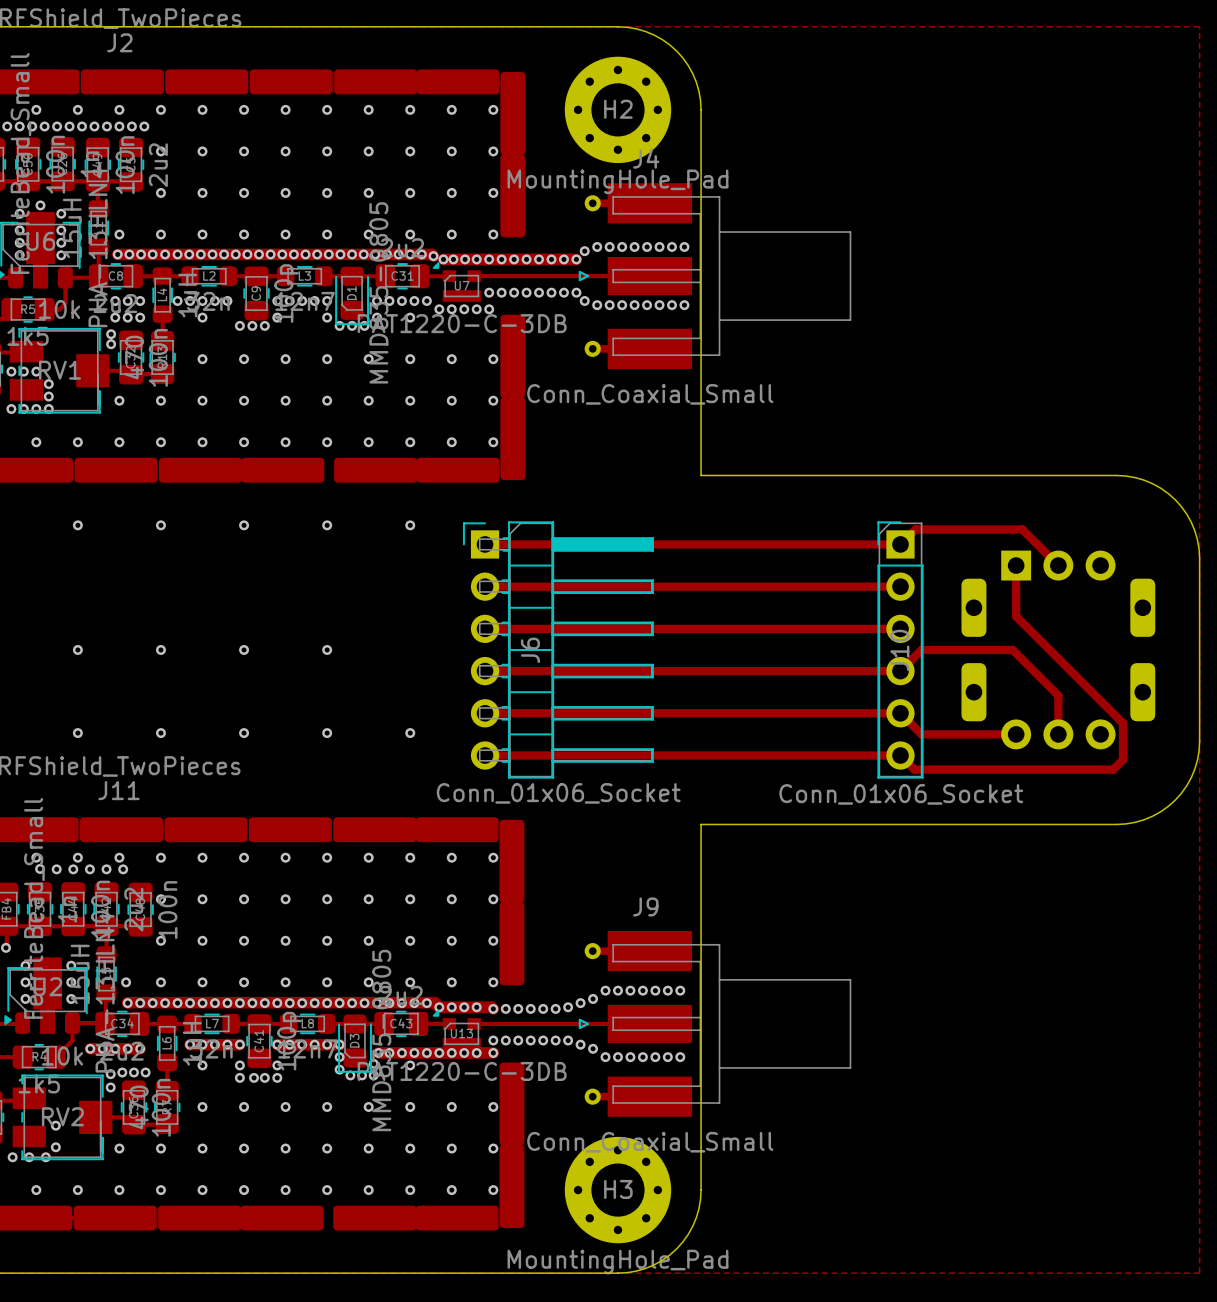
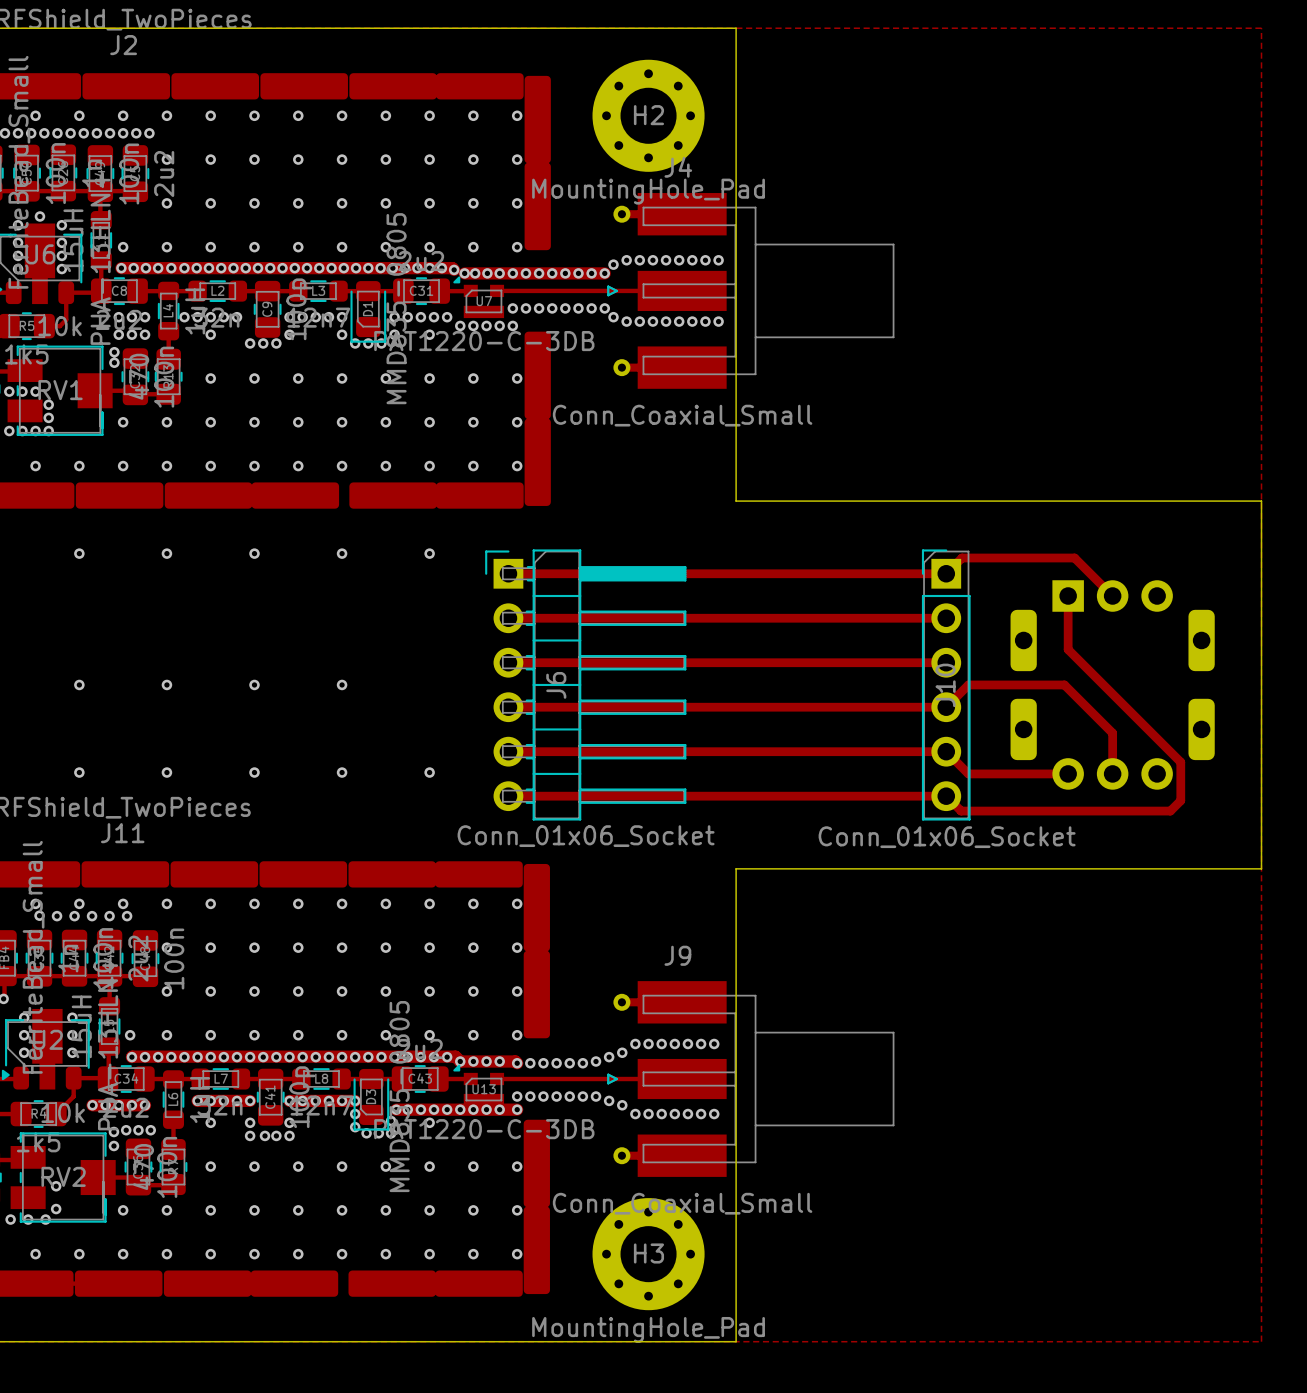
board edge: (617, 26) (645, 31) (662, 39) (676, 51) (688, 65) (696, 82) (701, 109) -> (648, 28) (736, 28) (736, 115)
board edge: (1116, 475) (1143, 480) (1160, 488) (1175, 499) (1186, 514) (1194, 531) (1199, 558) -> (1173, 501) (1261, 501) (1261, 588)
board edge: (1199, 741) (1194, 768) (1186, 785) (1175, 800) (1152, 816) (1135, 822) (1116, 824) -> (1261, 781) (1261, 868) (1173, 868)
board edge: (701, 1190) (698, 1208) (692, 1226) (676, 1248) (662, 1260) (645, 1268) (617, 1273) -> (736, 1254) (736, 1341) (648, 1341)

